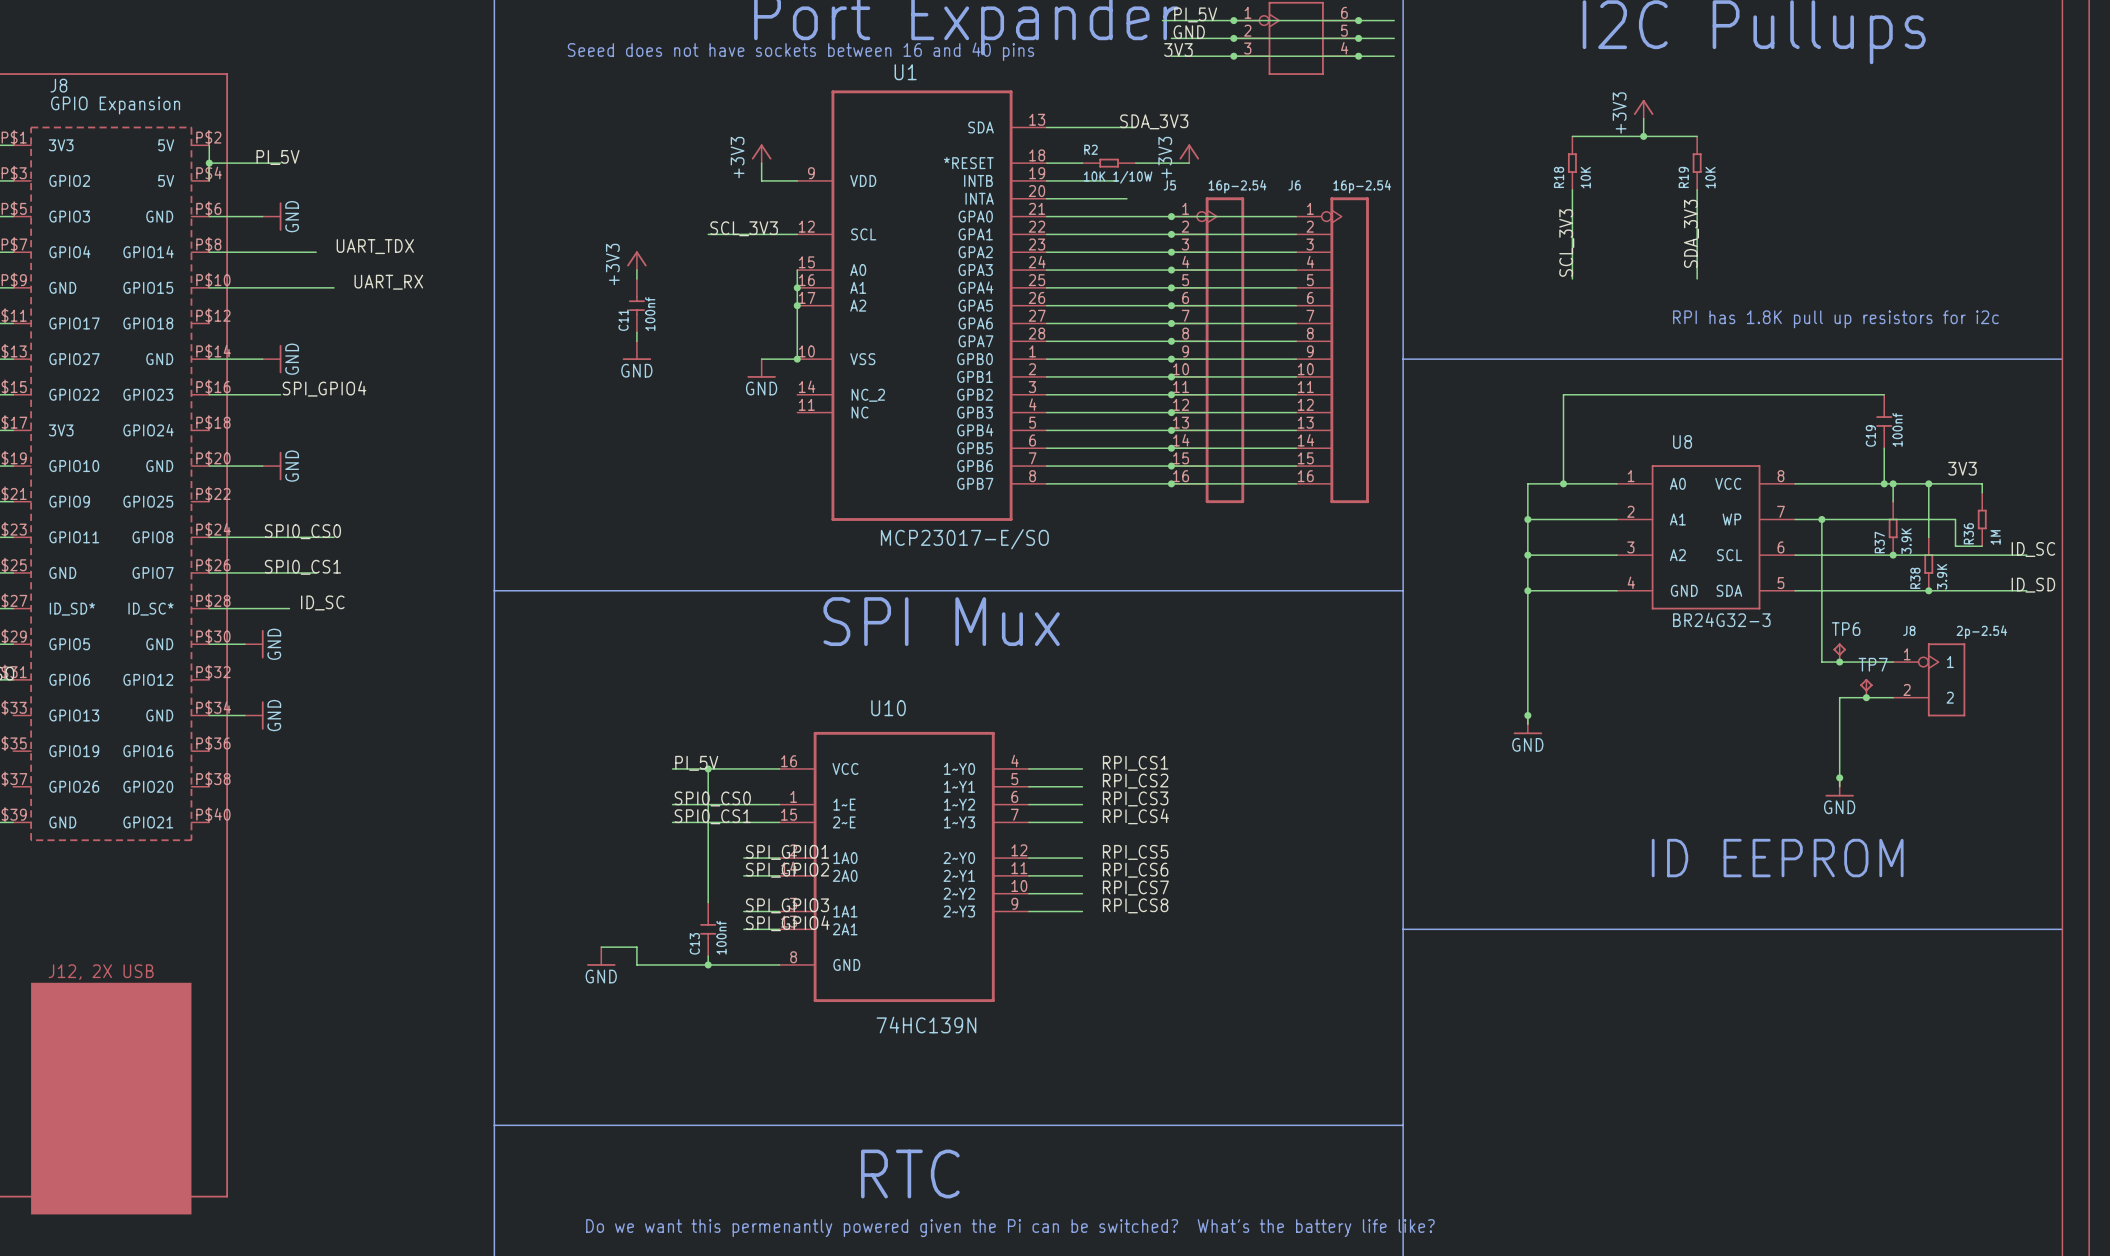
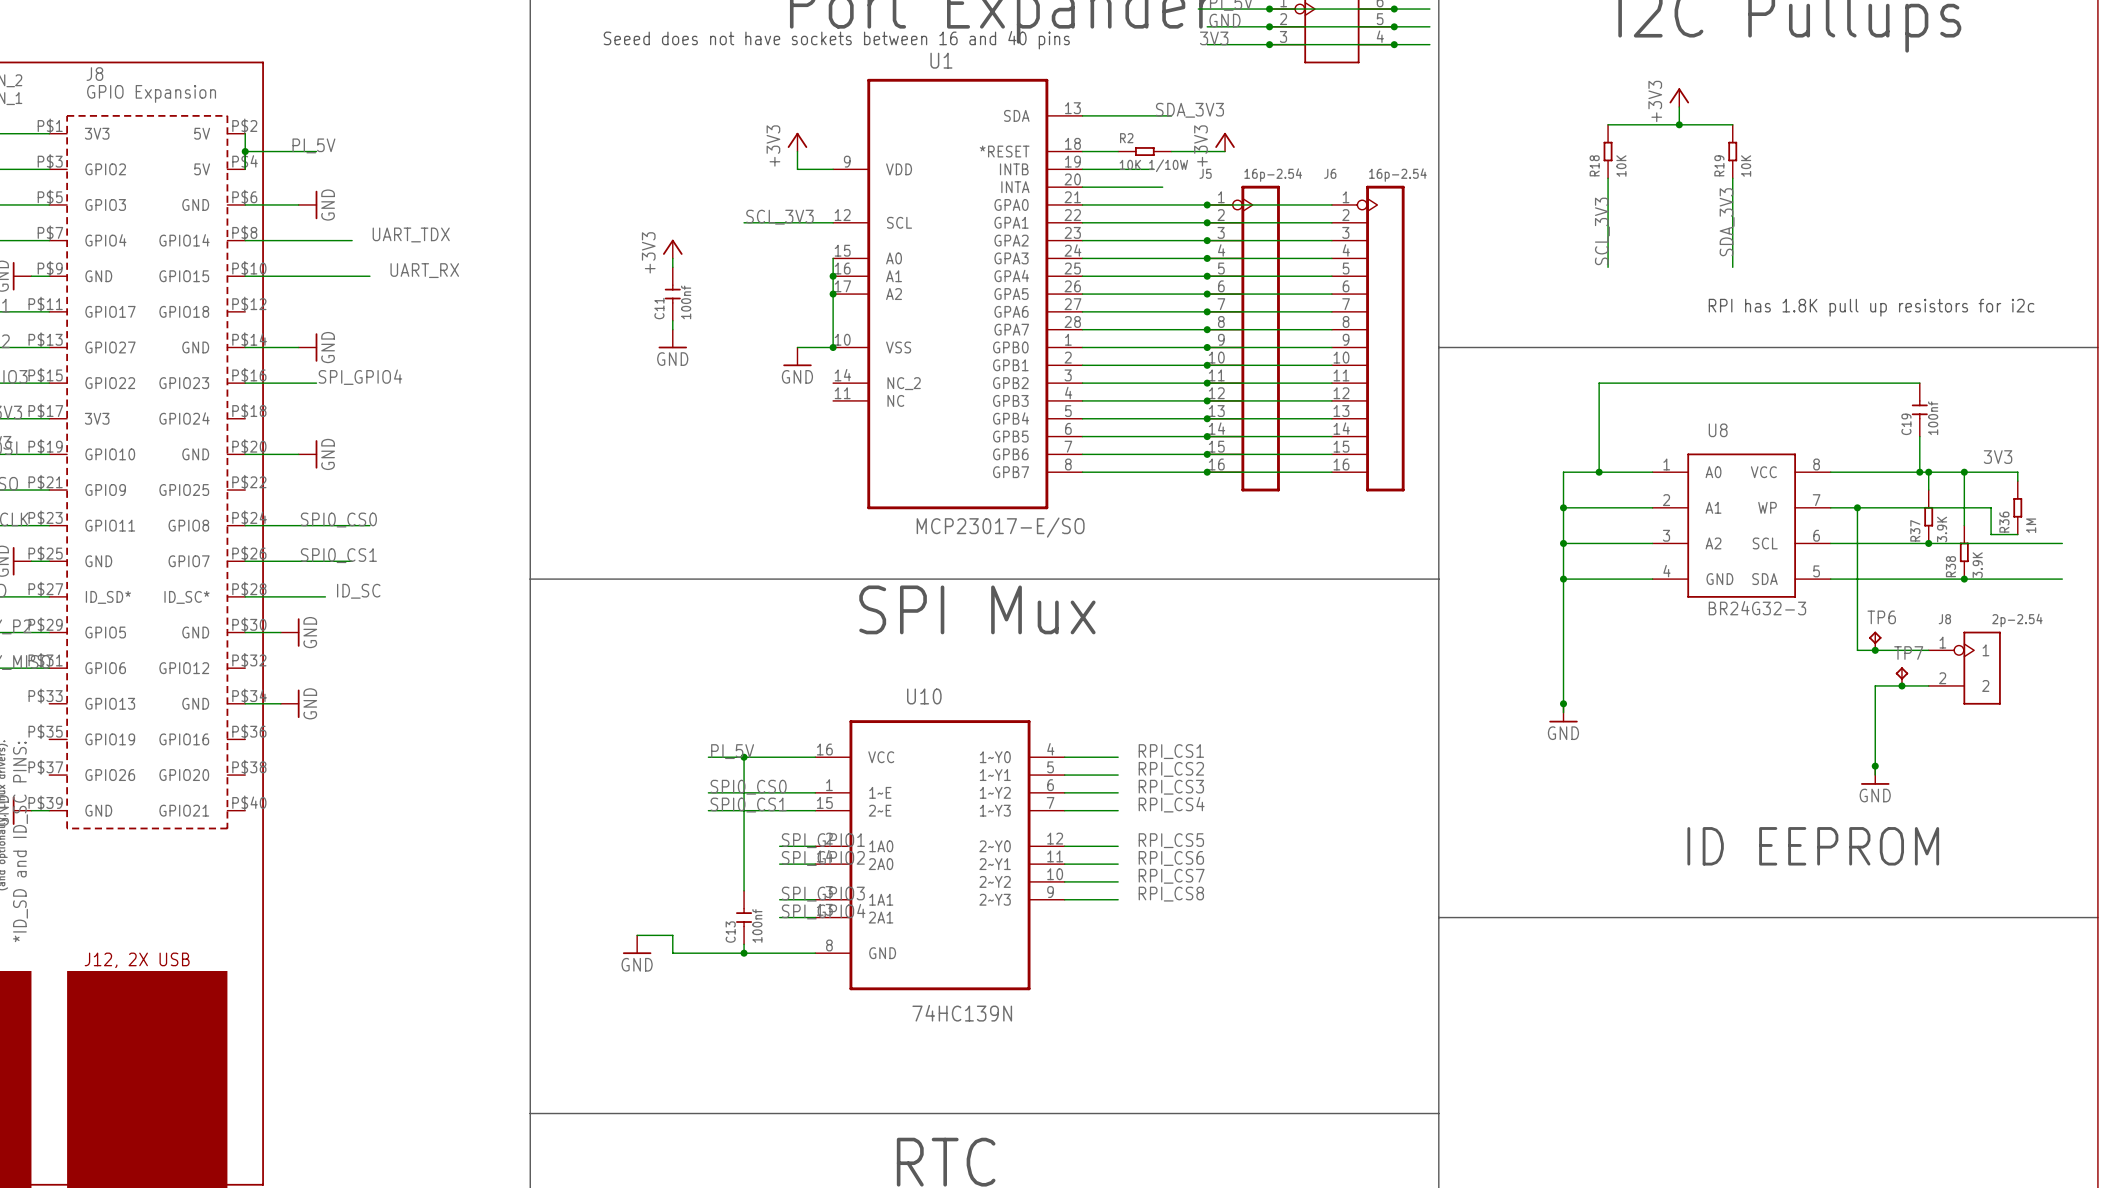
label: ID_SC (2033, 549) -> none
label: ID_SD (2033, 585) -> none

